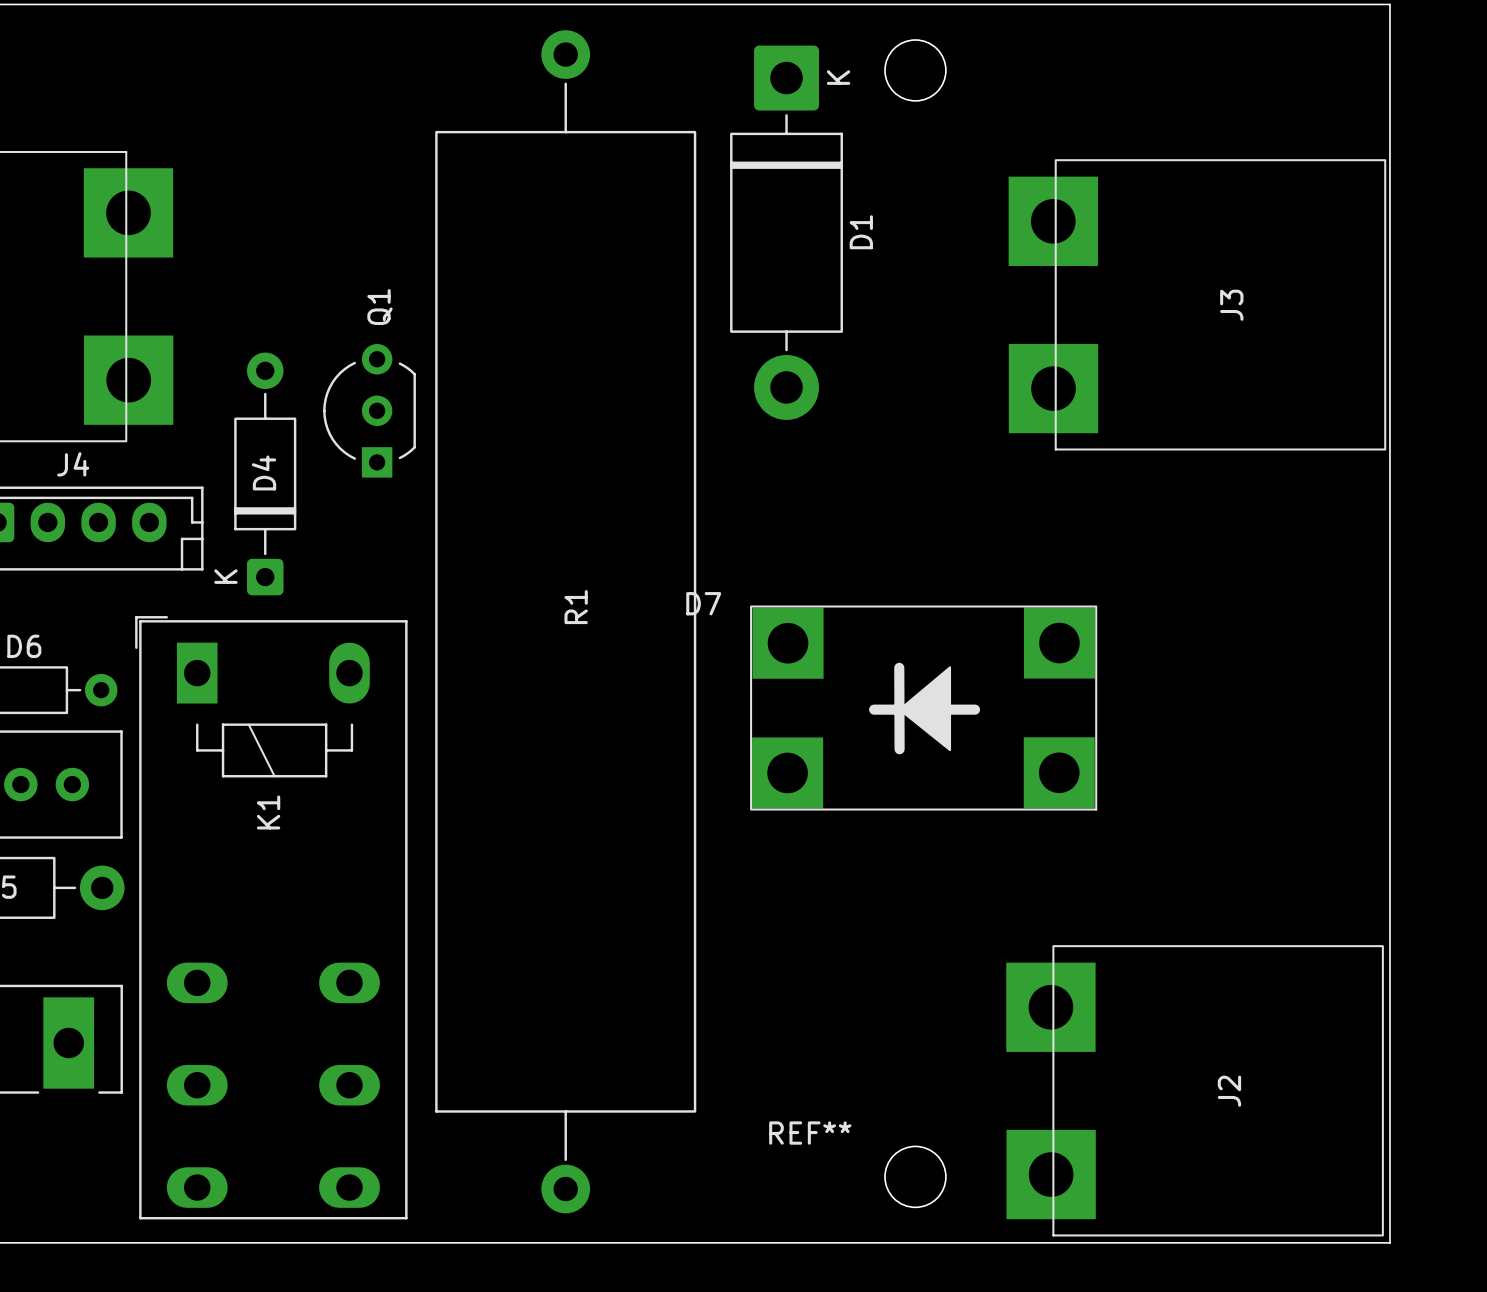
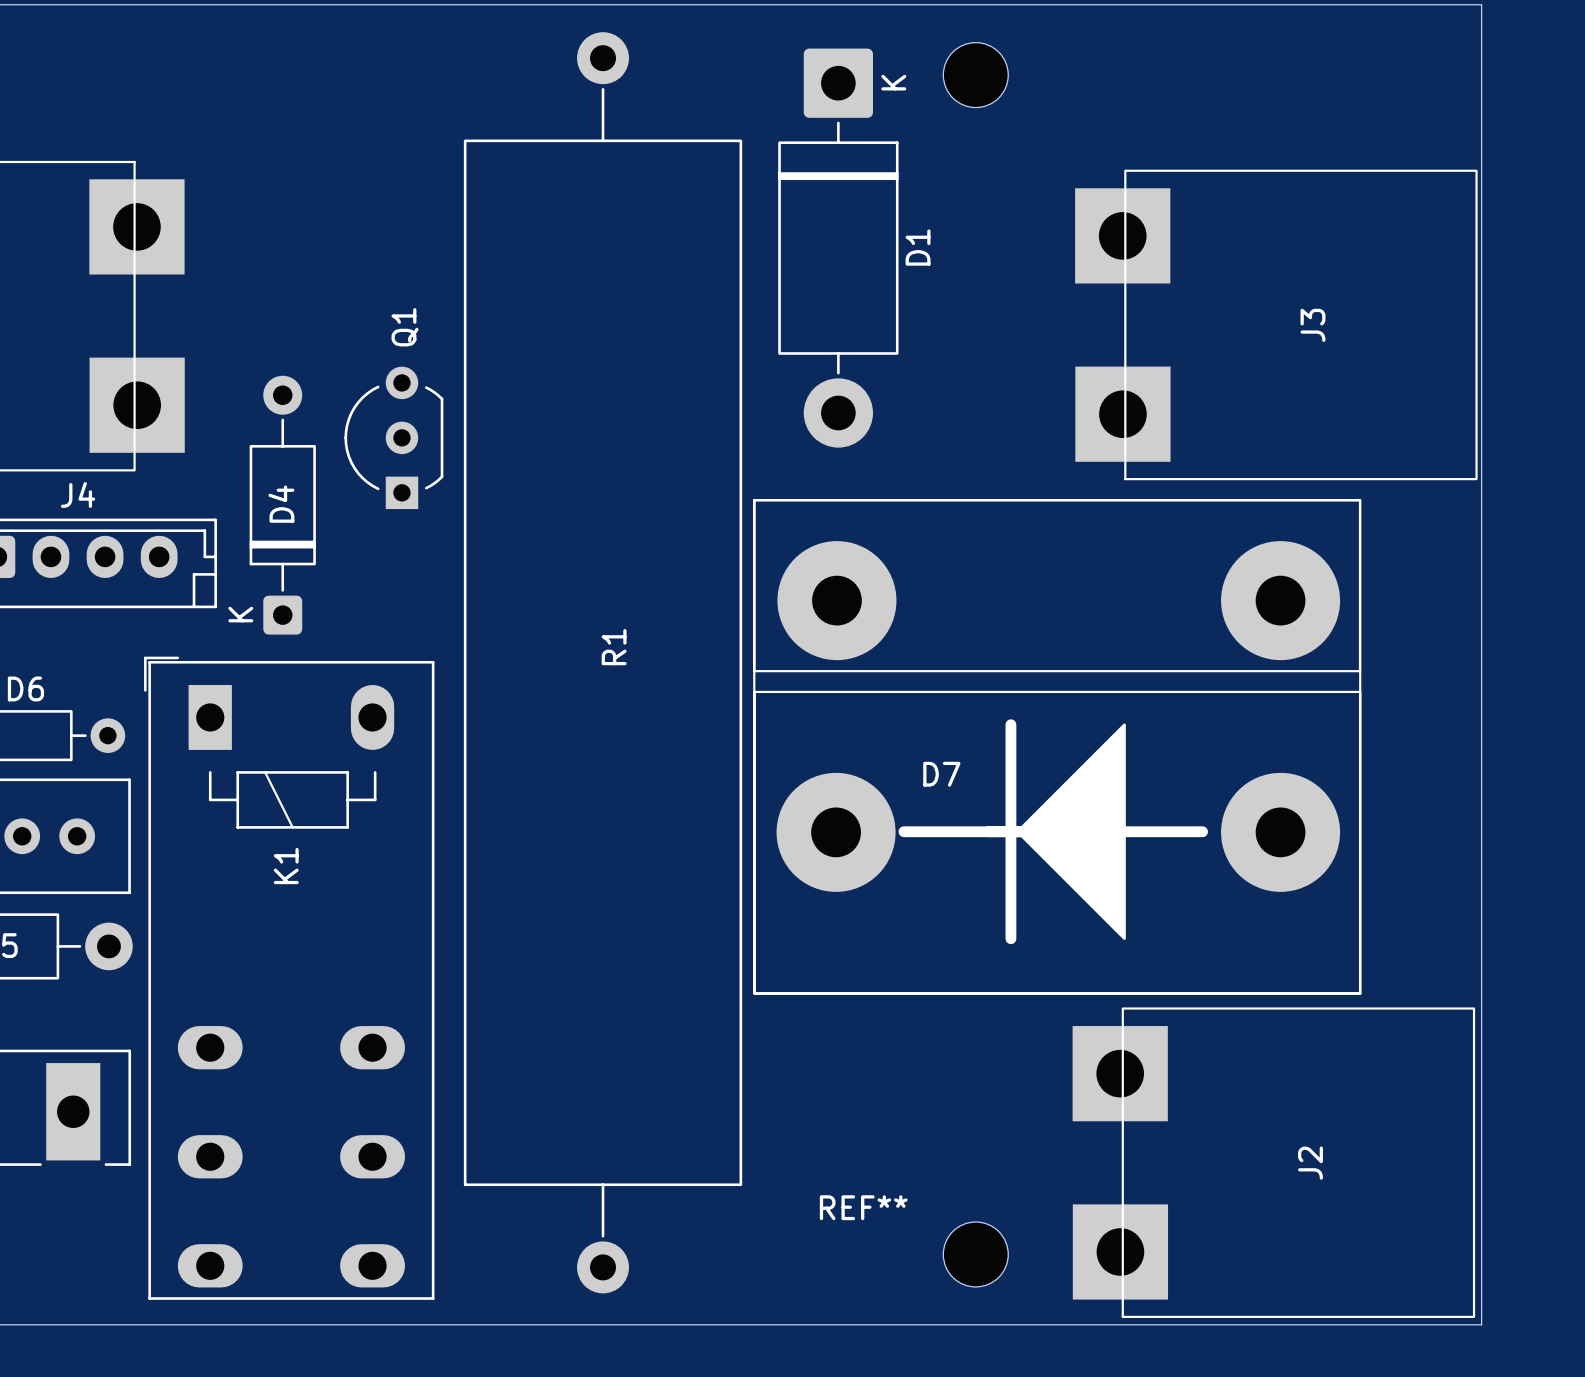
D7 name position: D7 (703, 603) -> D7 (941, 774)
D7 footprint: [750, 605, 1098, 811] -> [753, 499, 1362, 995]

